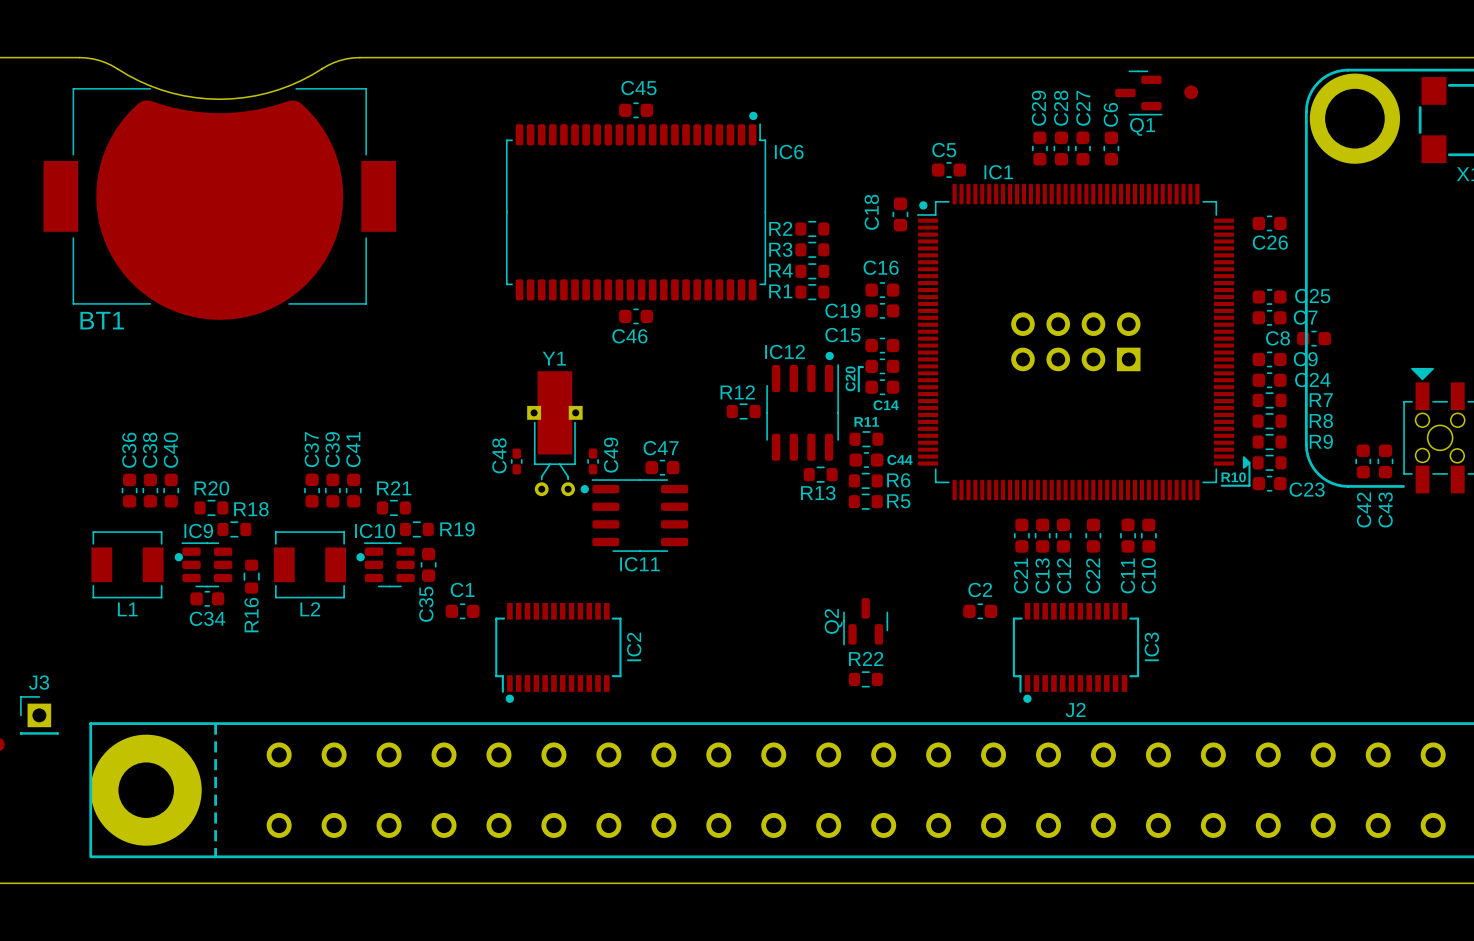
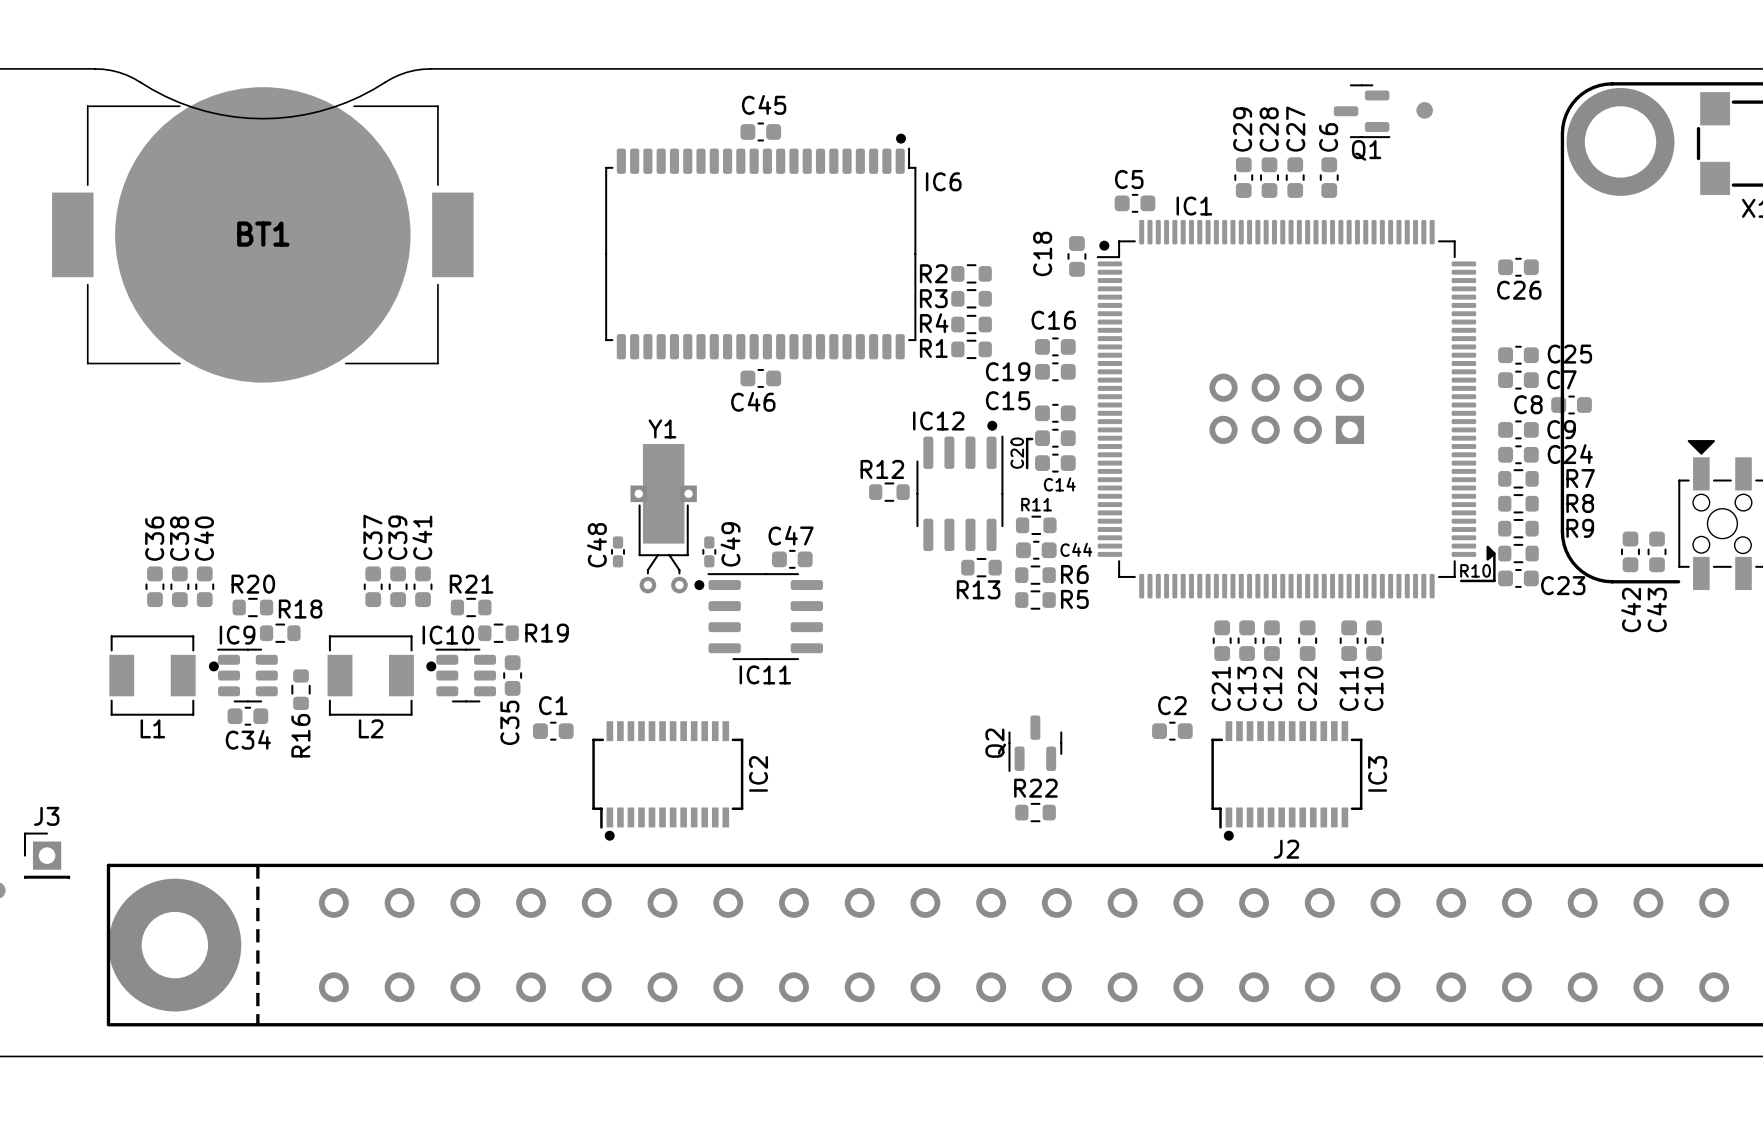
BT1 footprint: [43, 88, 397, 320] -> [52, 87, 474, 383]
BT1 name position: BT1 (102, 320) -> BT1 (263, 234)

